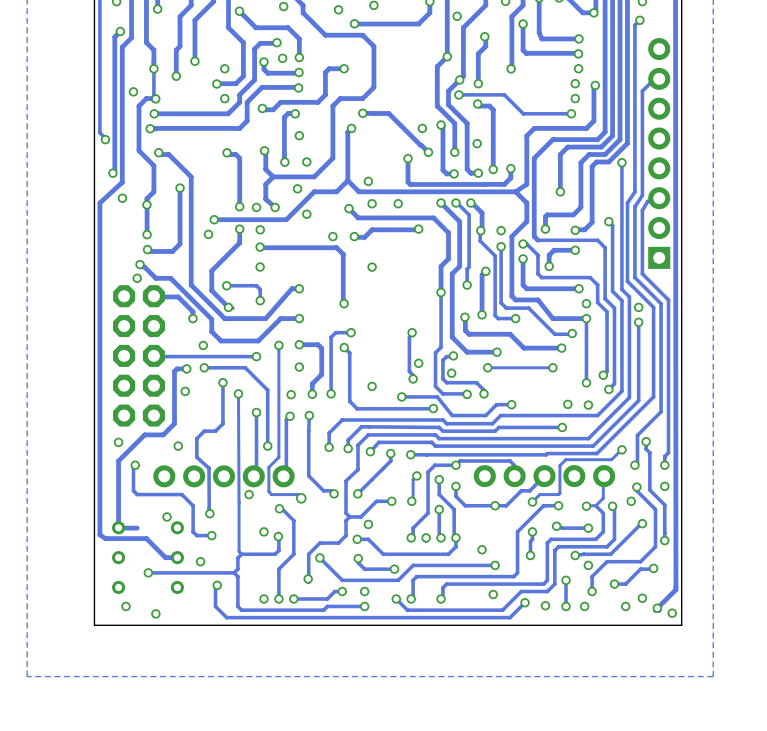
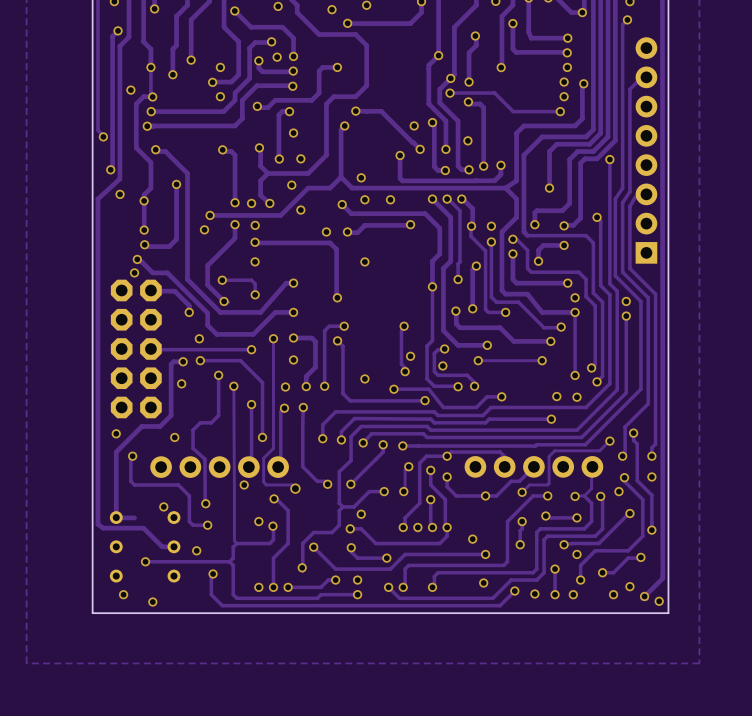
via: (457, 16) -> none

